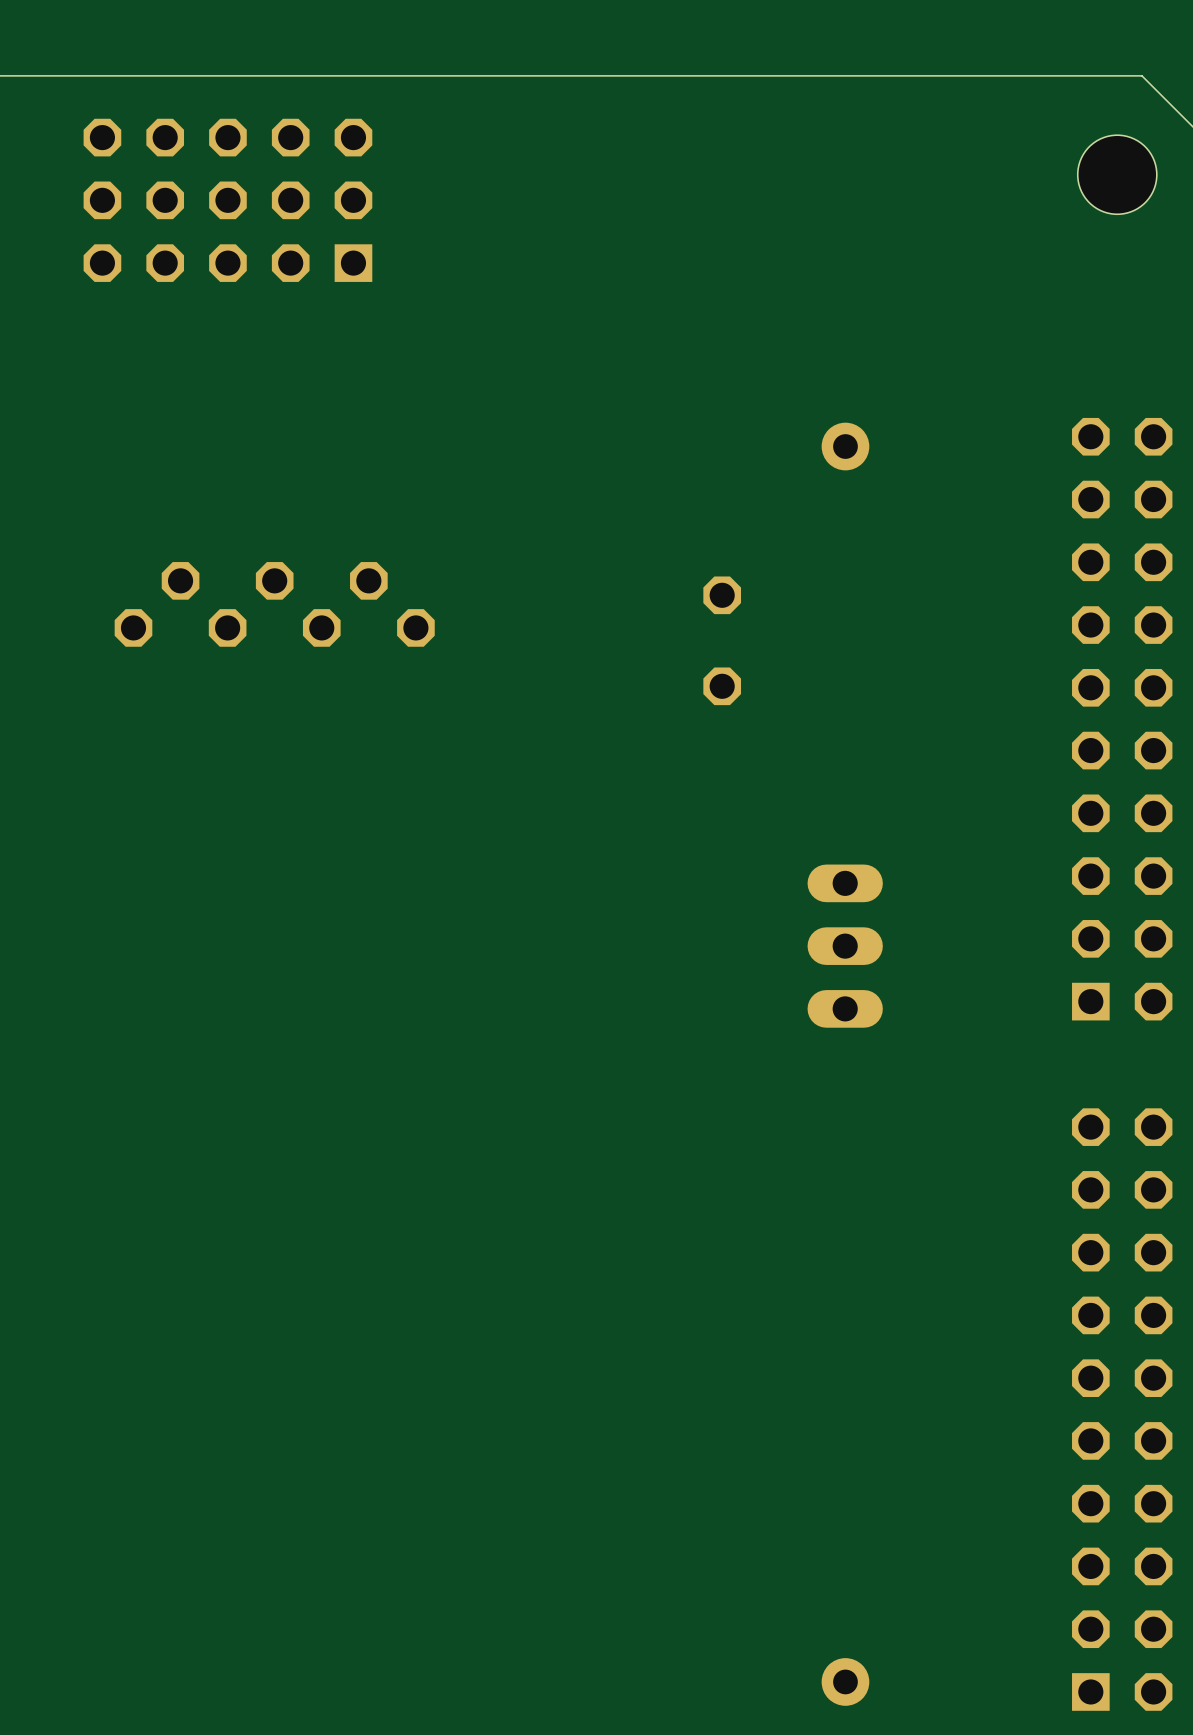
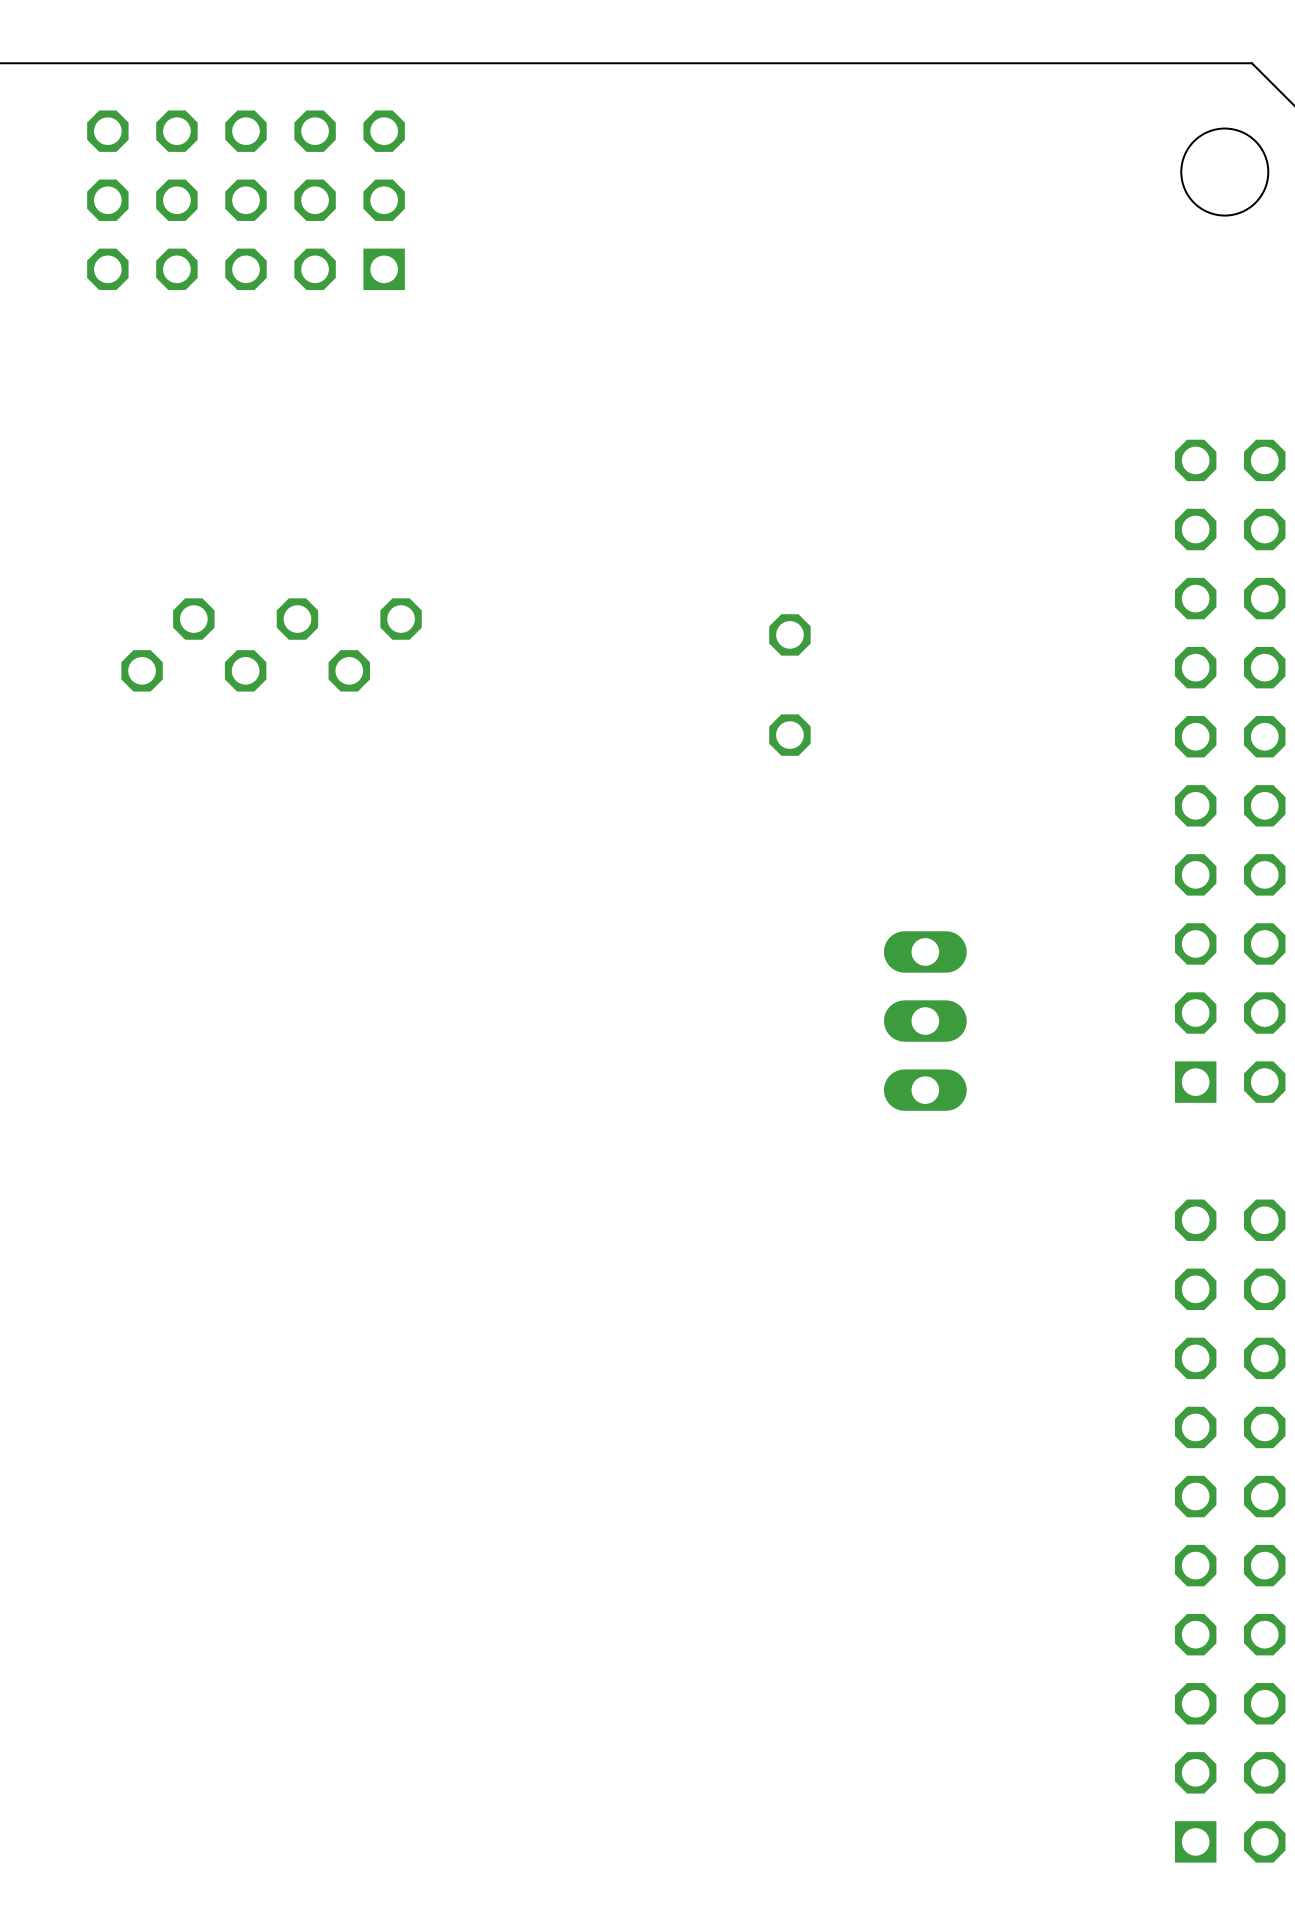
part: (845, 446) -> none
part: (415, 627) -> none
part: (845, 1681) -> none

